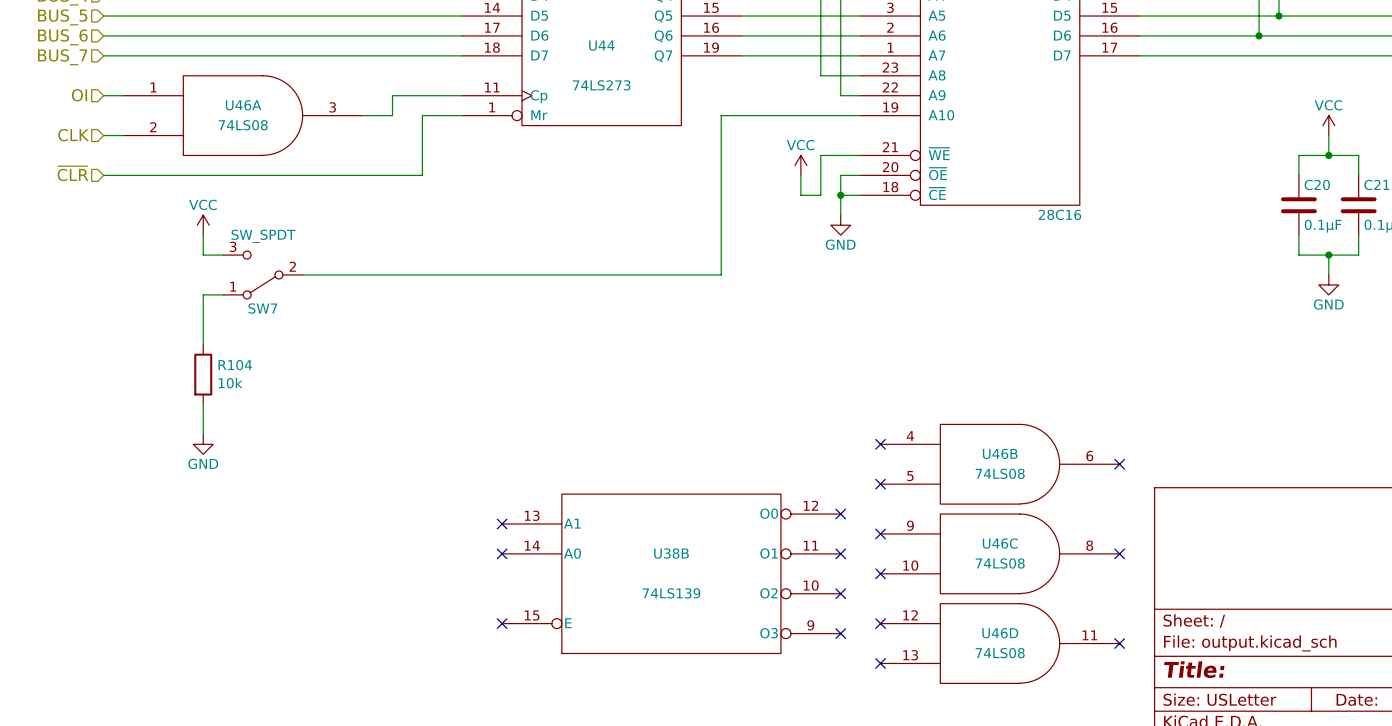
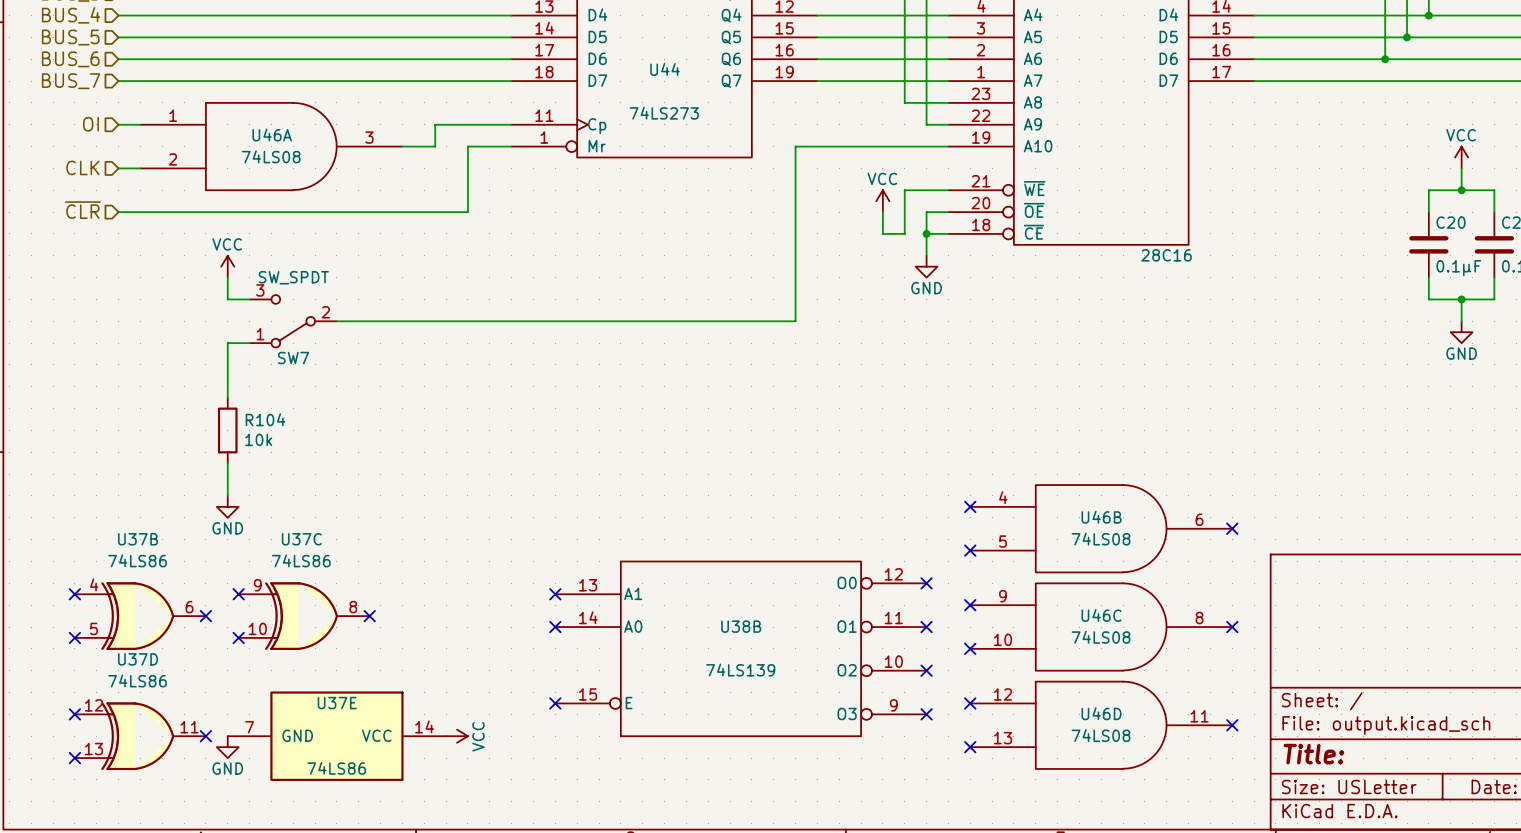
no-connect mark: none -> (74, 594)
no-connect mark: none -> (238, 594)
U37B: none -> 74LS86 (140, 616)
no-connect mark: none -> (205, 616)
U37C: none -> 74LS86 (304, 616)
no-connect mark: none -> (369, 616)
no-connect mark: none -> (74, 637)
no-connect mark: none -> (238, 637)
no-connect mark: none -> (74, 714)
U37D: none -> 74LS86 (140, 736)
no-connect mark: none -> (205, 736)
U37E: none -> 74LS86 (336, 736)
power symbol: none -> VCC (457, 736)
power symbol: none -> GND (227, 747)
no-connect mark: none -> (74, 758)

